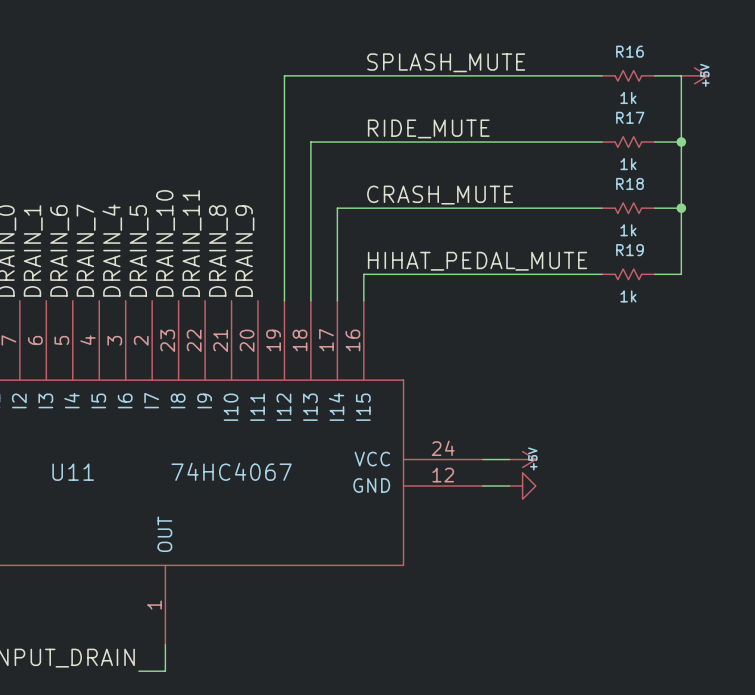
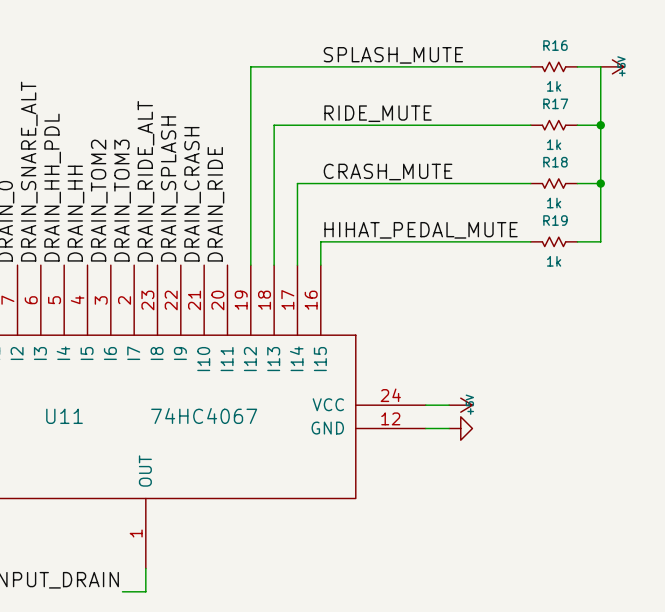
label: DRAIN_10 (165, 243) -> DRAIN_RIDE_ALT (145, 181)
label: DRAIN_11 (191, 243) -> DRAIN_SPLASH (169, 188)
label: DRAIN_1 (33, 250) -> DRAIN_SNARE_ALT (29, 171)
label: DRAIN_6 (59, 250) -> DRAIN_HH_PDL (52, 187)
label: DRAIN_7 (86, 250) -> DRAIN_HH (75, 213)
label: DRAIN_4 (112, 250) -> DRAIN_TOM2 (99, 200)
label: DRAIN_5 (139, 250) -> DRAIN_TOM3 (122, 200)
label: DRAIN_8 (218, 250) -> DRAIN_CRASH (192, 194)
label: DRAIN_9 (244, 250) -> DRAIN_RIDE (215, 204)

